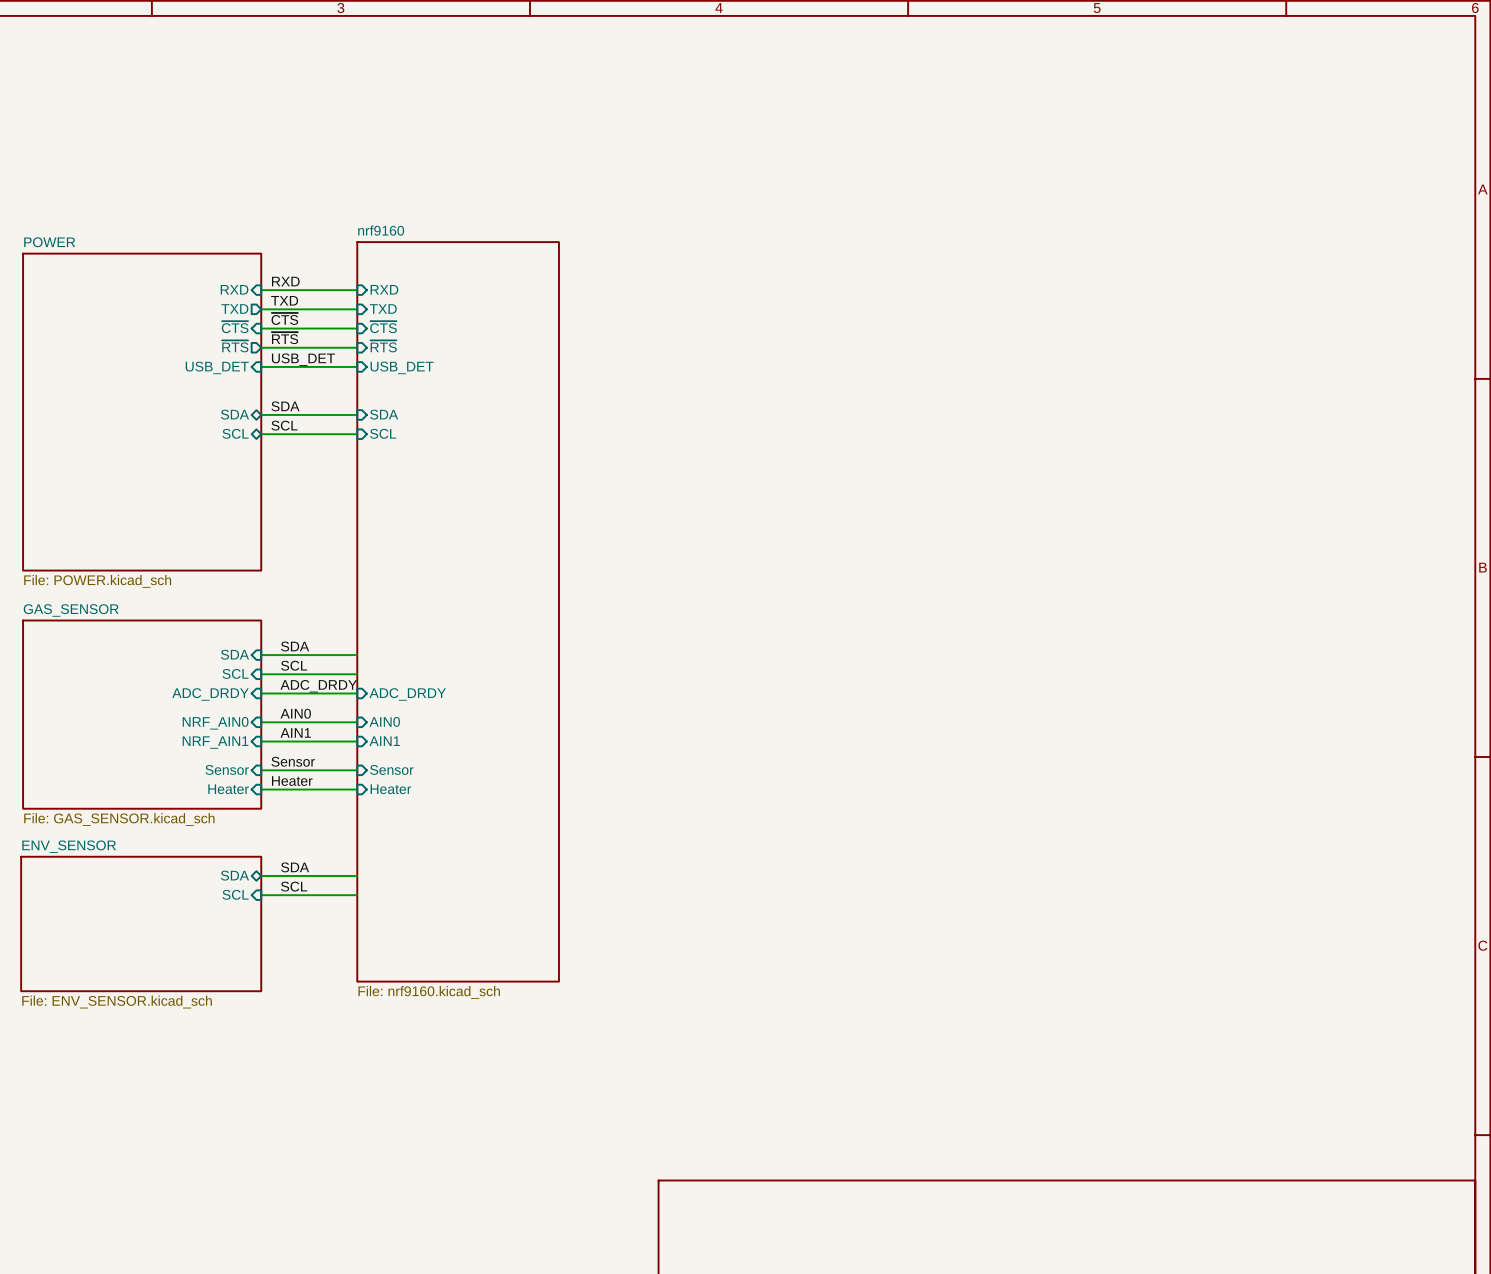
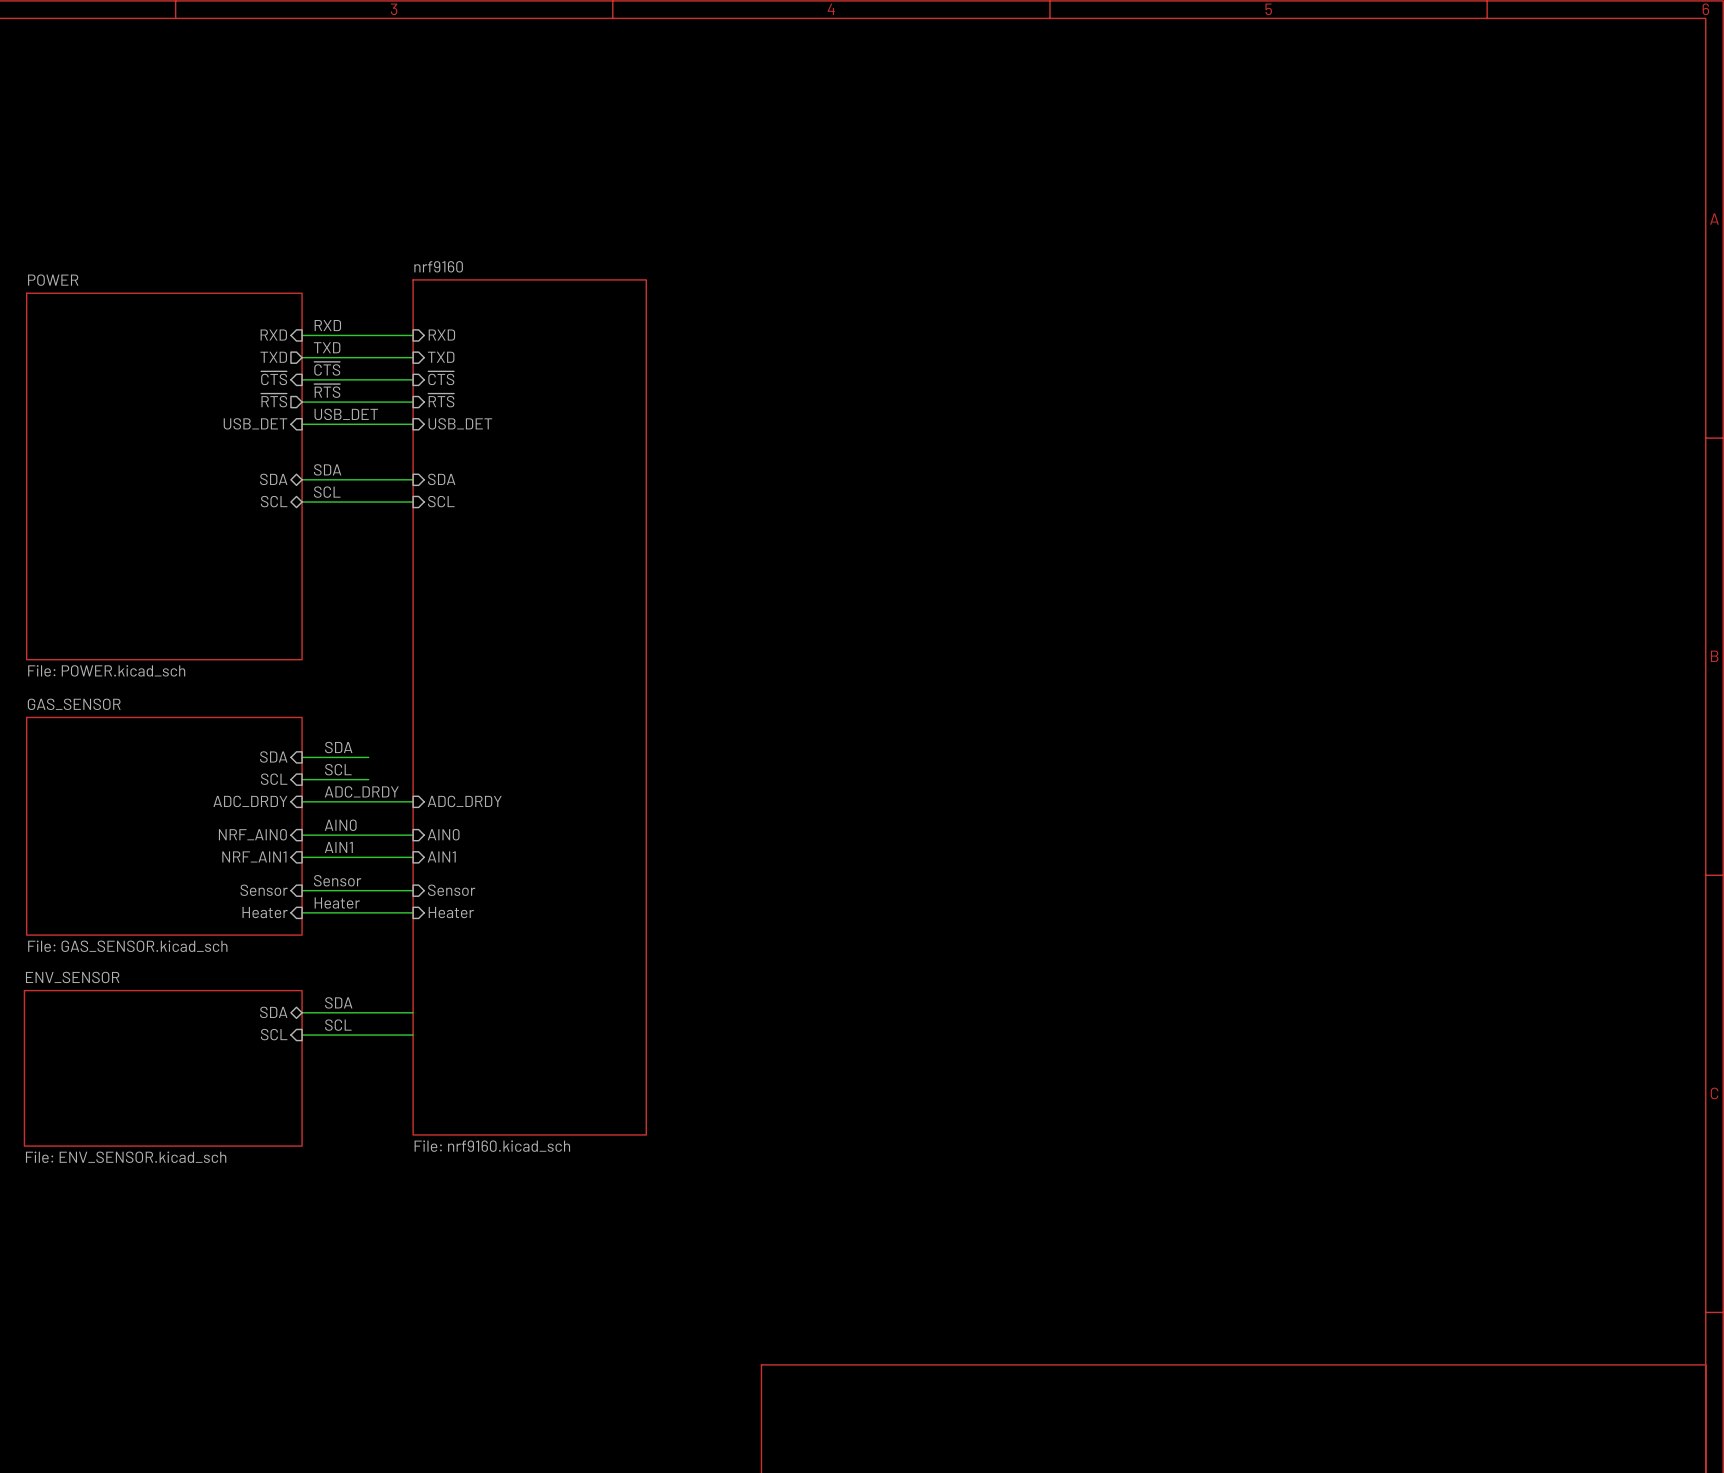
wire: (318, 655) (357, 655) -> none
wire: (318, 674) (357, 674) -> none

